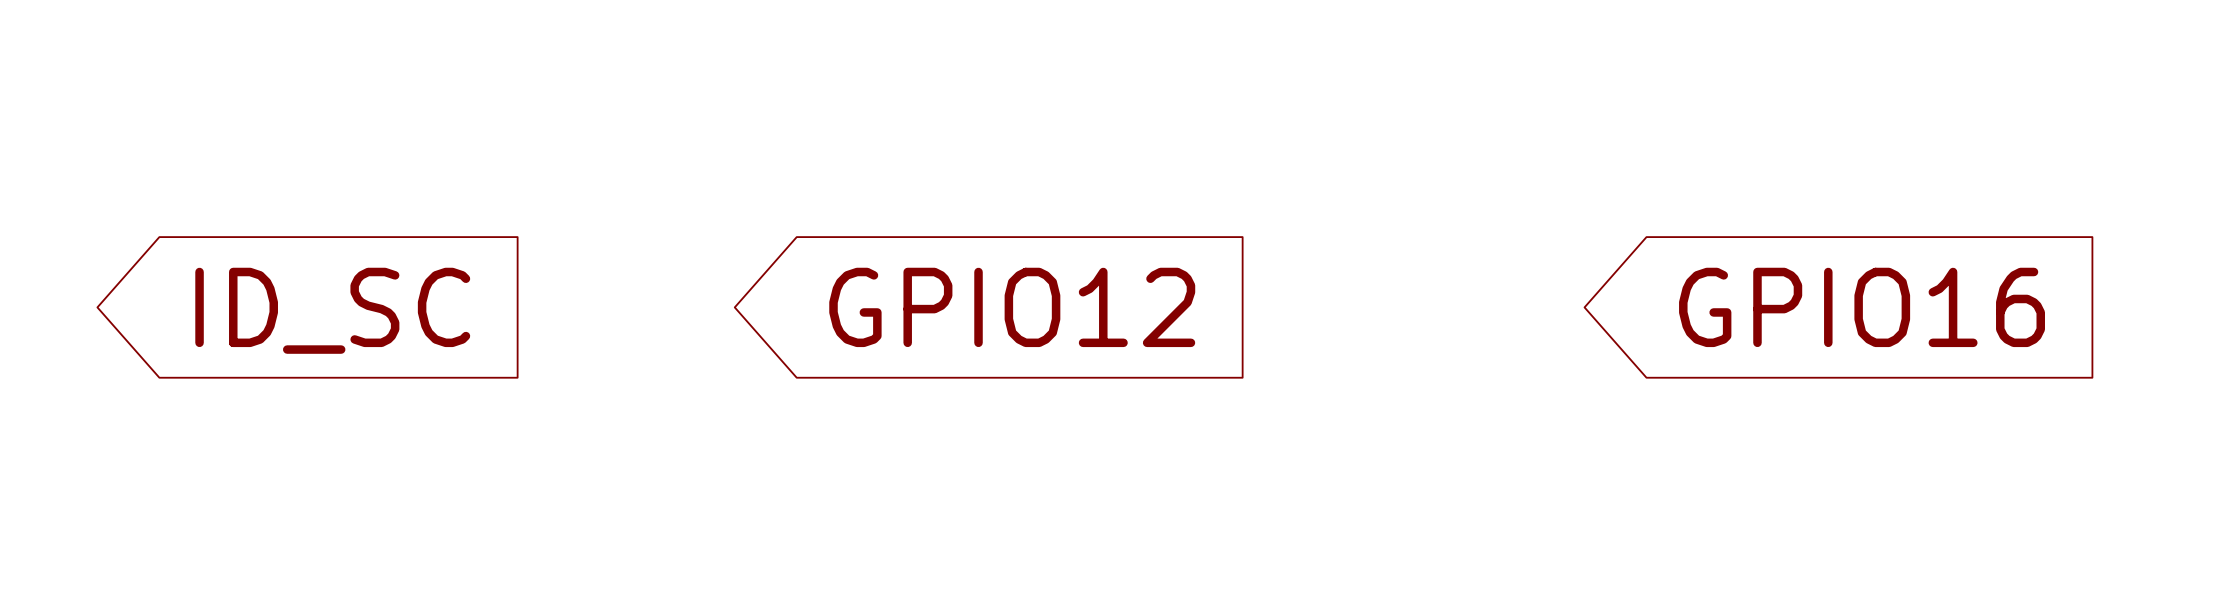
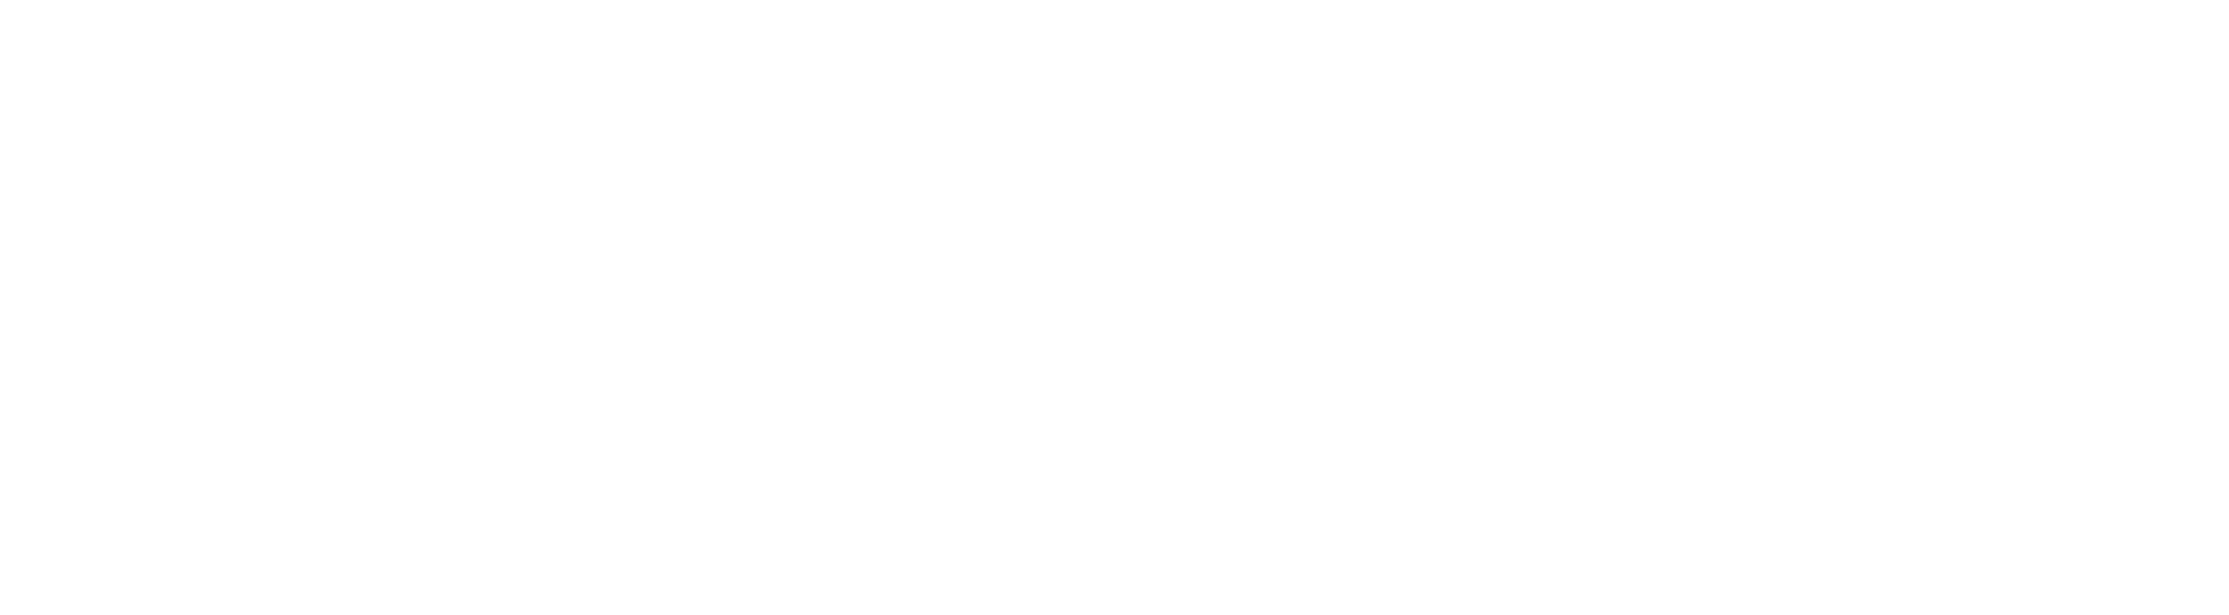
global label: GPIO12 (1012, 307) -> none
global label: GPIO16 (1862, 307) -> none
global label: ID_SC (332, 310) -> none

